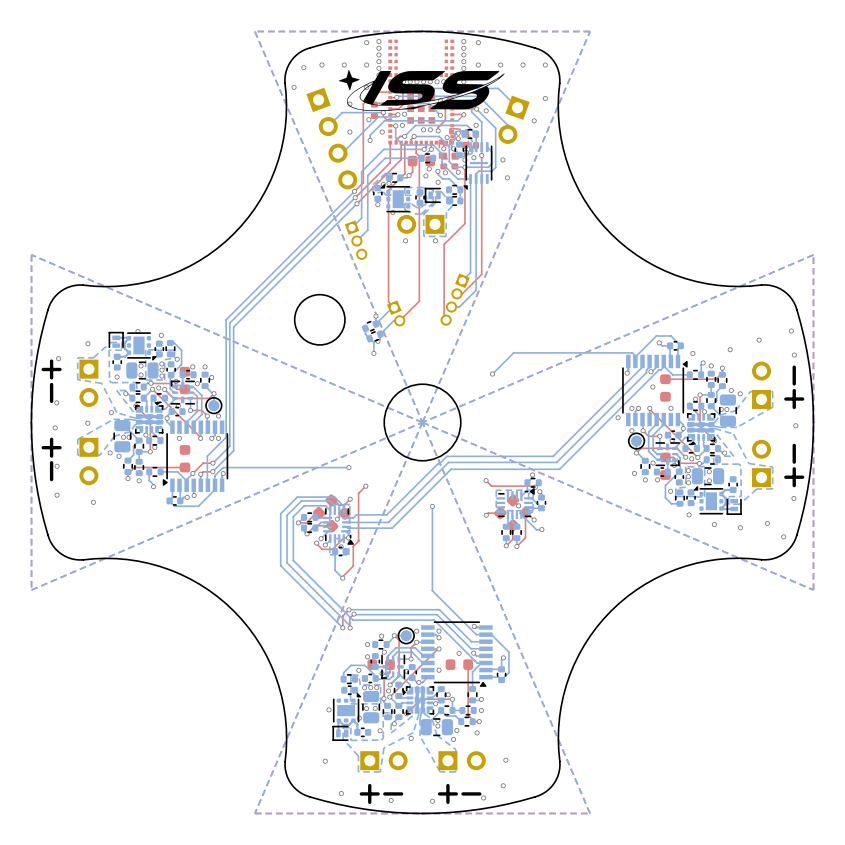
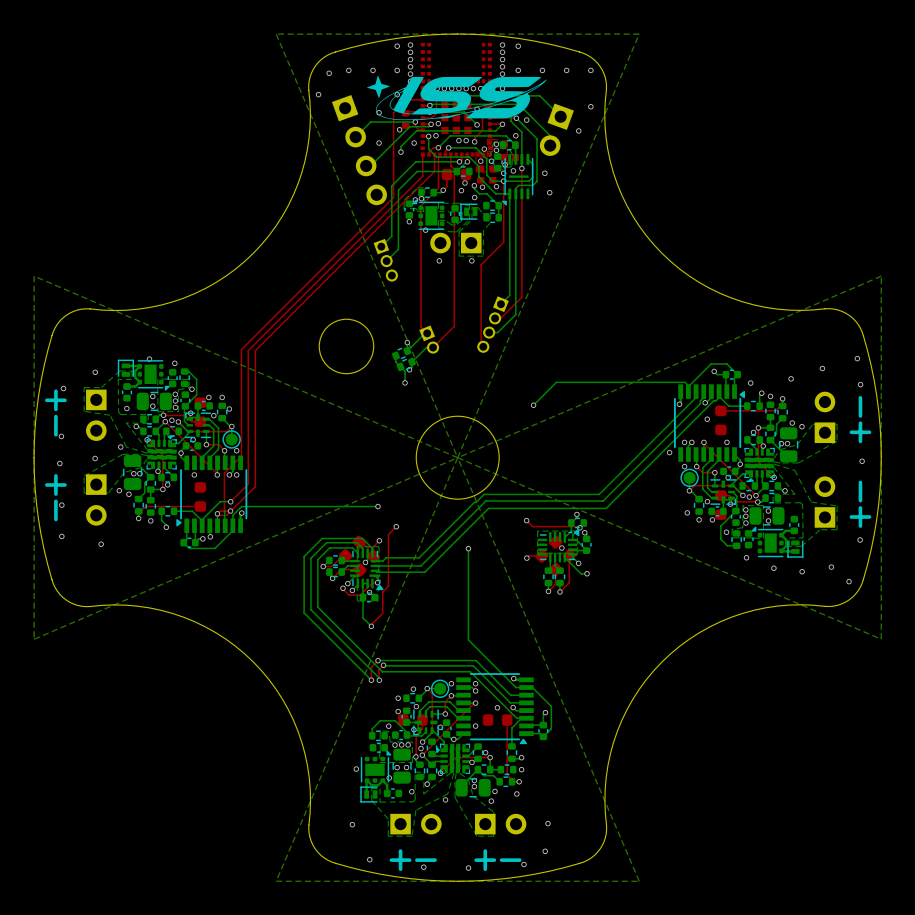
top track: (401, 158) (357, 203) -> (434, 171) (255, 350) (255, 486) (226, 515) (219, 515)
top track: (390, 162) (355, 197) -> (422, 176) (248, 350) (248, 484) (230, 501)
top track: (363, 182) (354, 191) -> (393, 197) (241, 349) (241, 456) (224, 473) (224, 510)
bottom track: (354, 191) (226, 319) (226, 437) (207, 456) (207, 471) -> none
via: (354, 191) -> none
bottom track: (355, 197) (229, 323) (229, 446) (212, 463) -> (208, 512) (220, 501) (230, 501)
via: (355, 197) -> none
bottom track: (357, 203) (233, 327) (233, 450) (212, 471) -> none
via: (357, 203) -> none
top track: (212, 463) (203, 463) (192, 473) -> none
via: (192, 473) -> none

